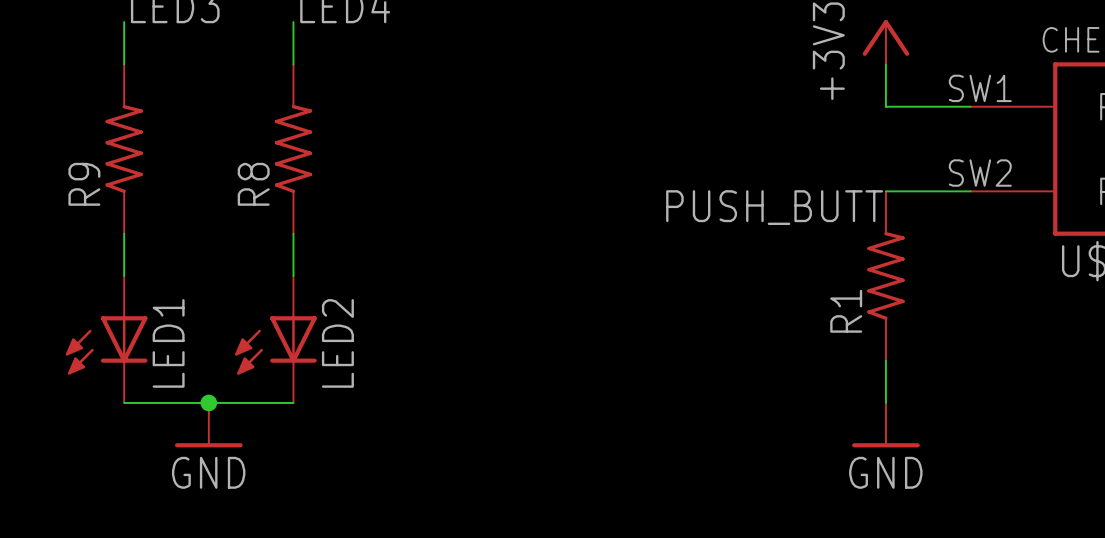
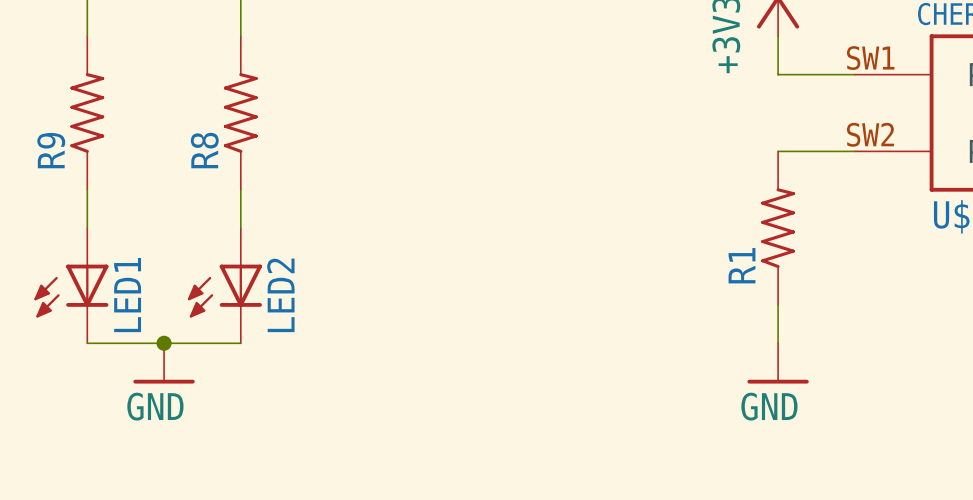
label: PUSH_BUTT (774, 207) -> none

